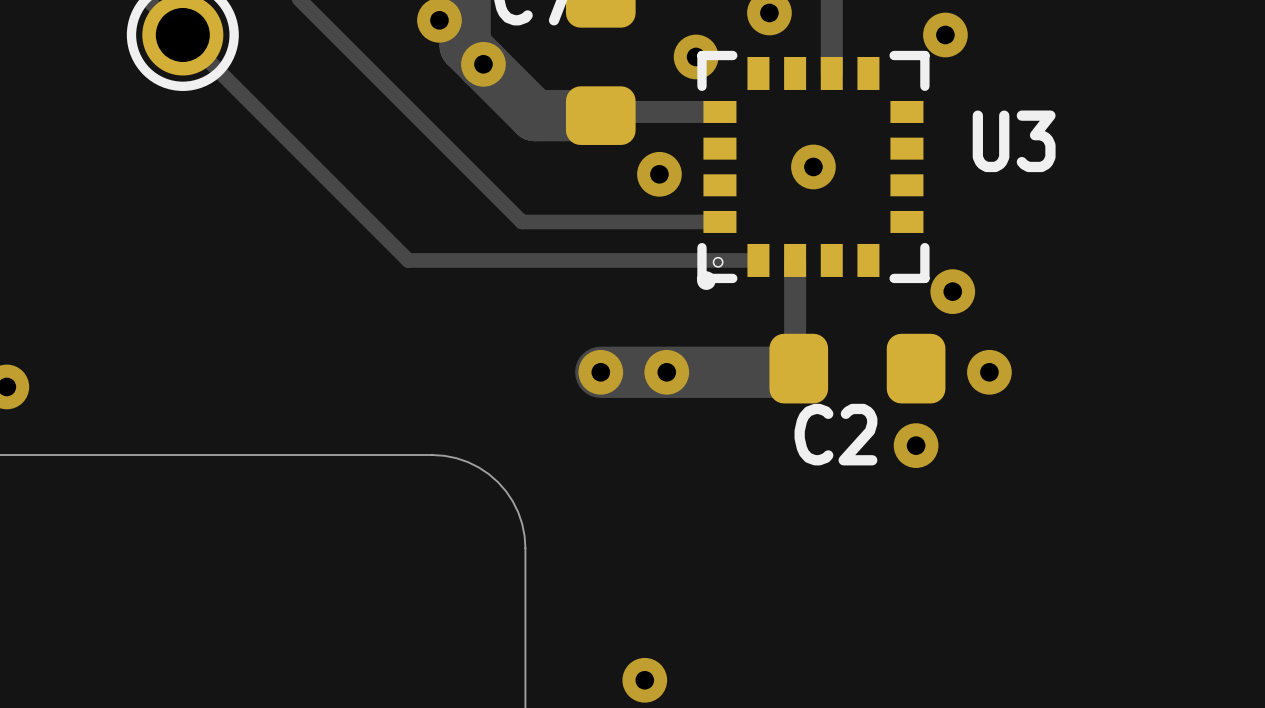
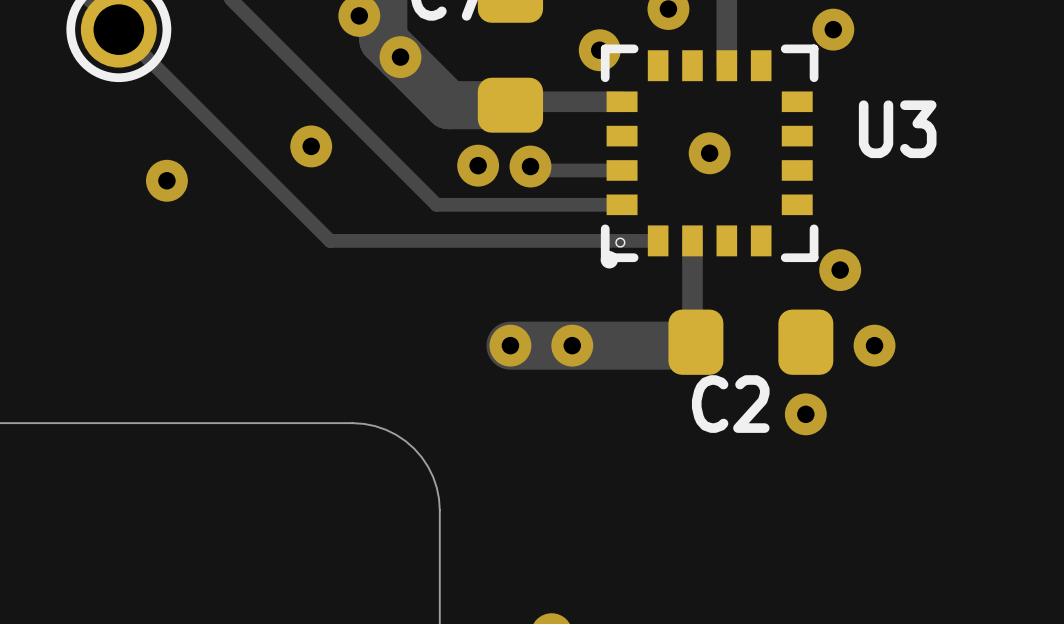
via: none -> (311, 146)
via position: (659, 174) -> (530, 166)
via: none -> (478, 165)
track: none -> (530, 166) (534, 170) (622, 170)
via: none -> (166, 180)

